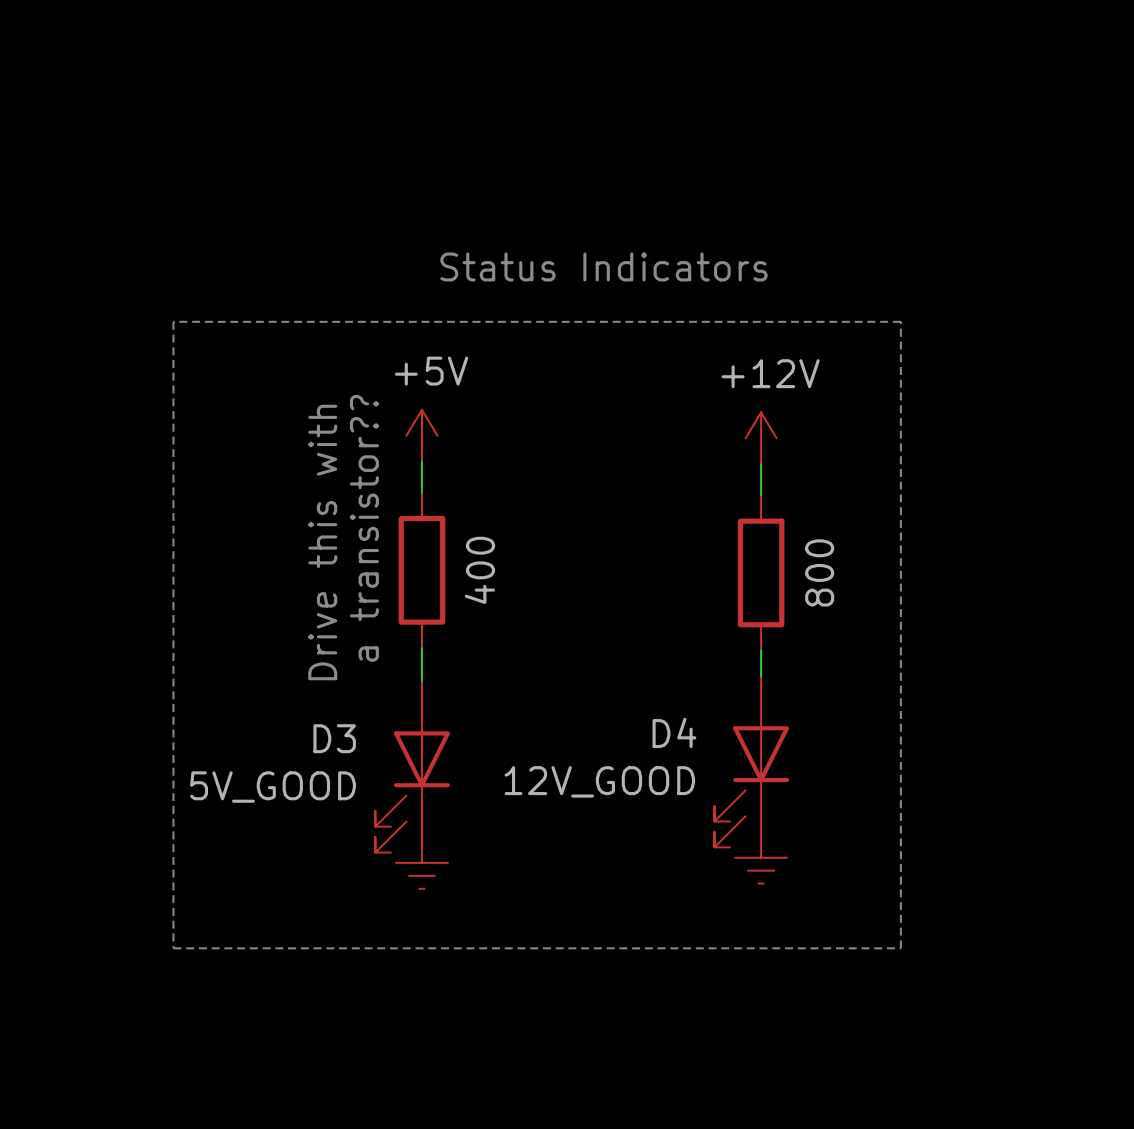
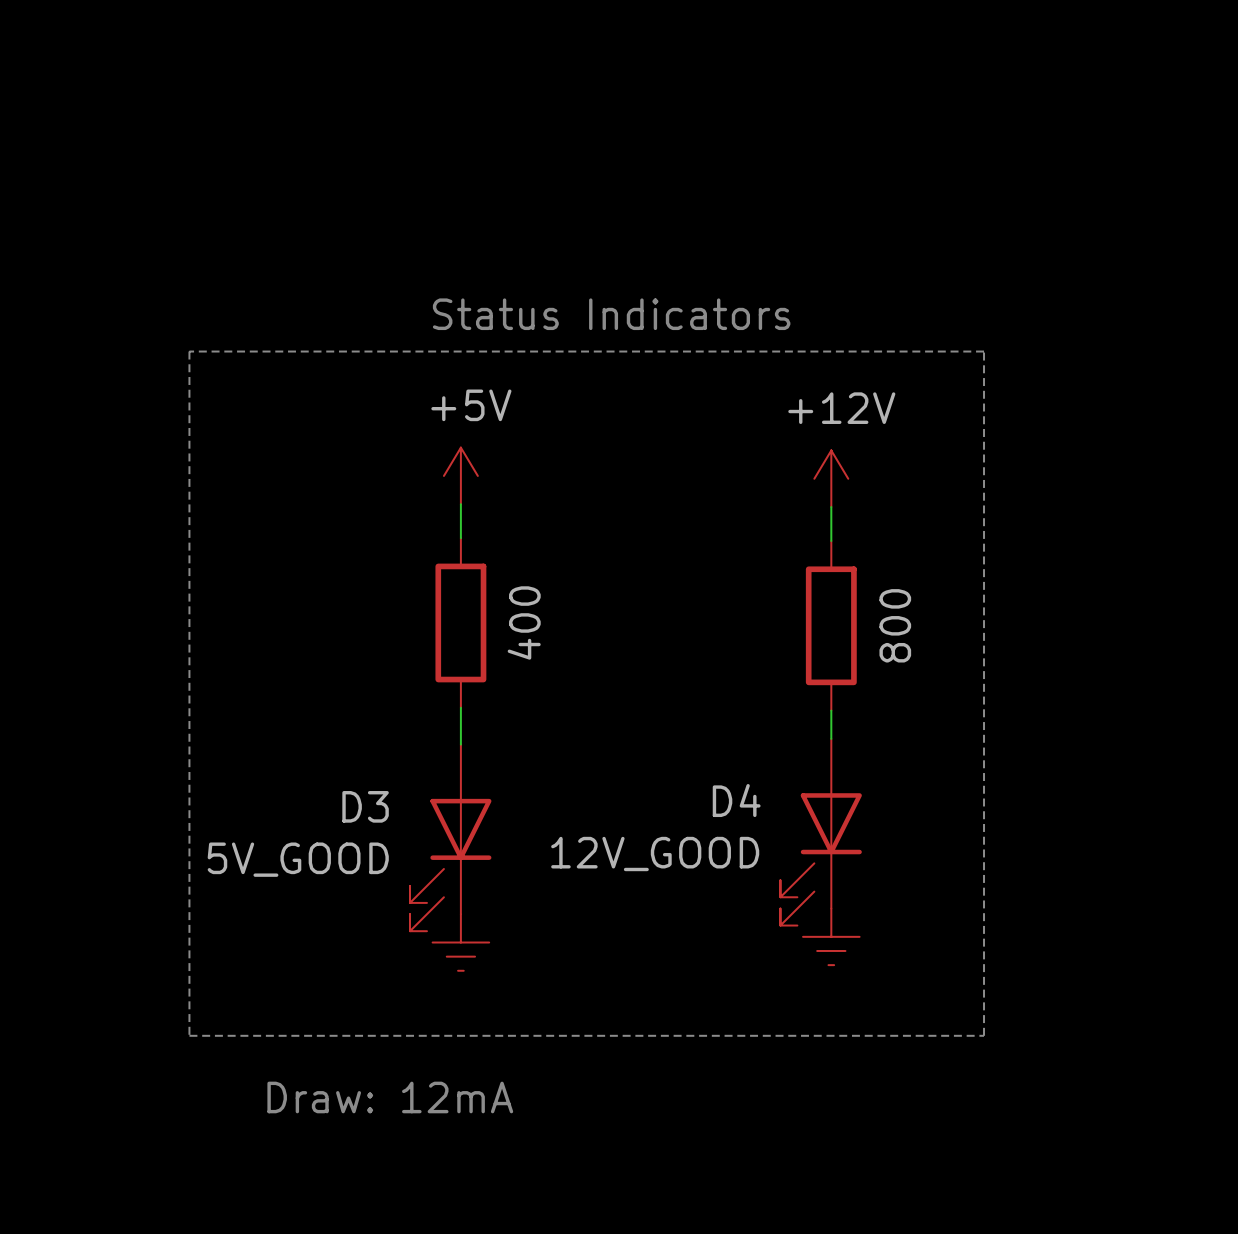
text position: Status Indicators (603, 266) -> Status Indicators (611, 314)
text: a transistor?? (364, 528) -> none
text: Drive this with (322, 542) -> none
text: none -> Draw: 12mA (390, 1097)

